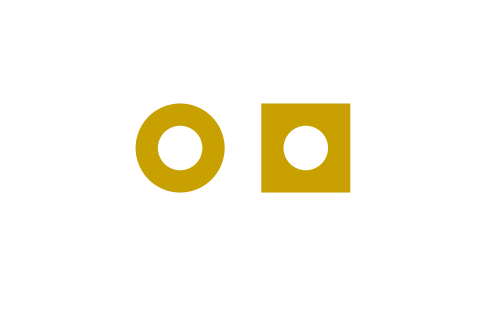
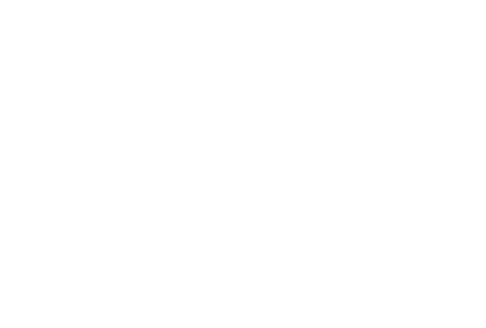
part: (242, 148) -> none

